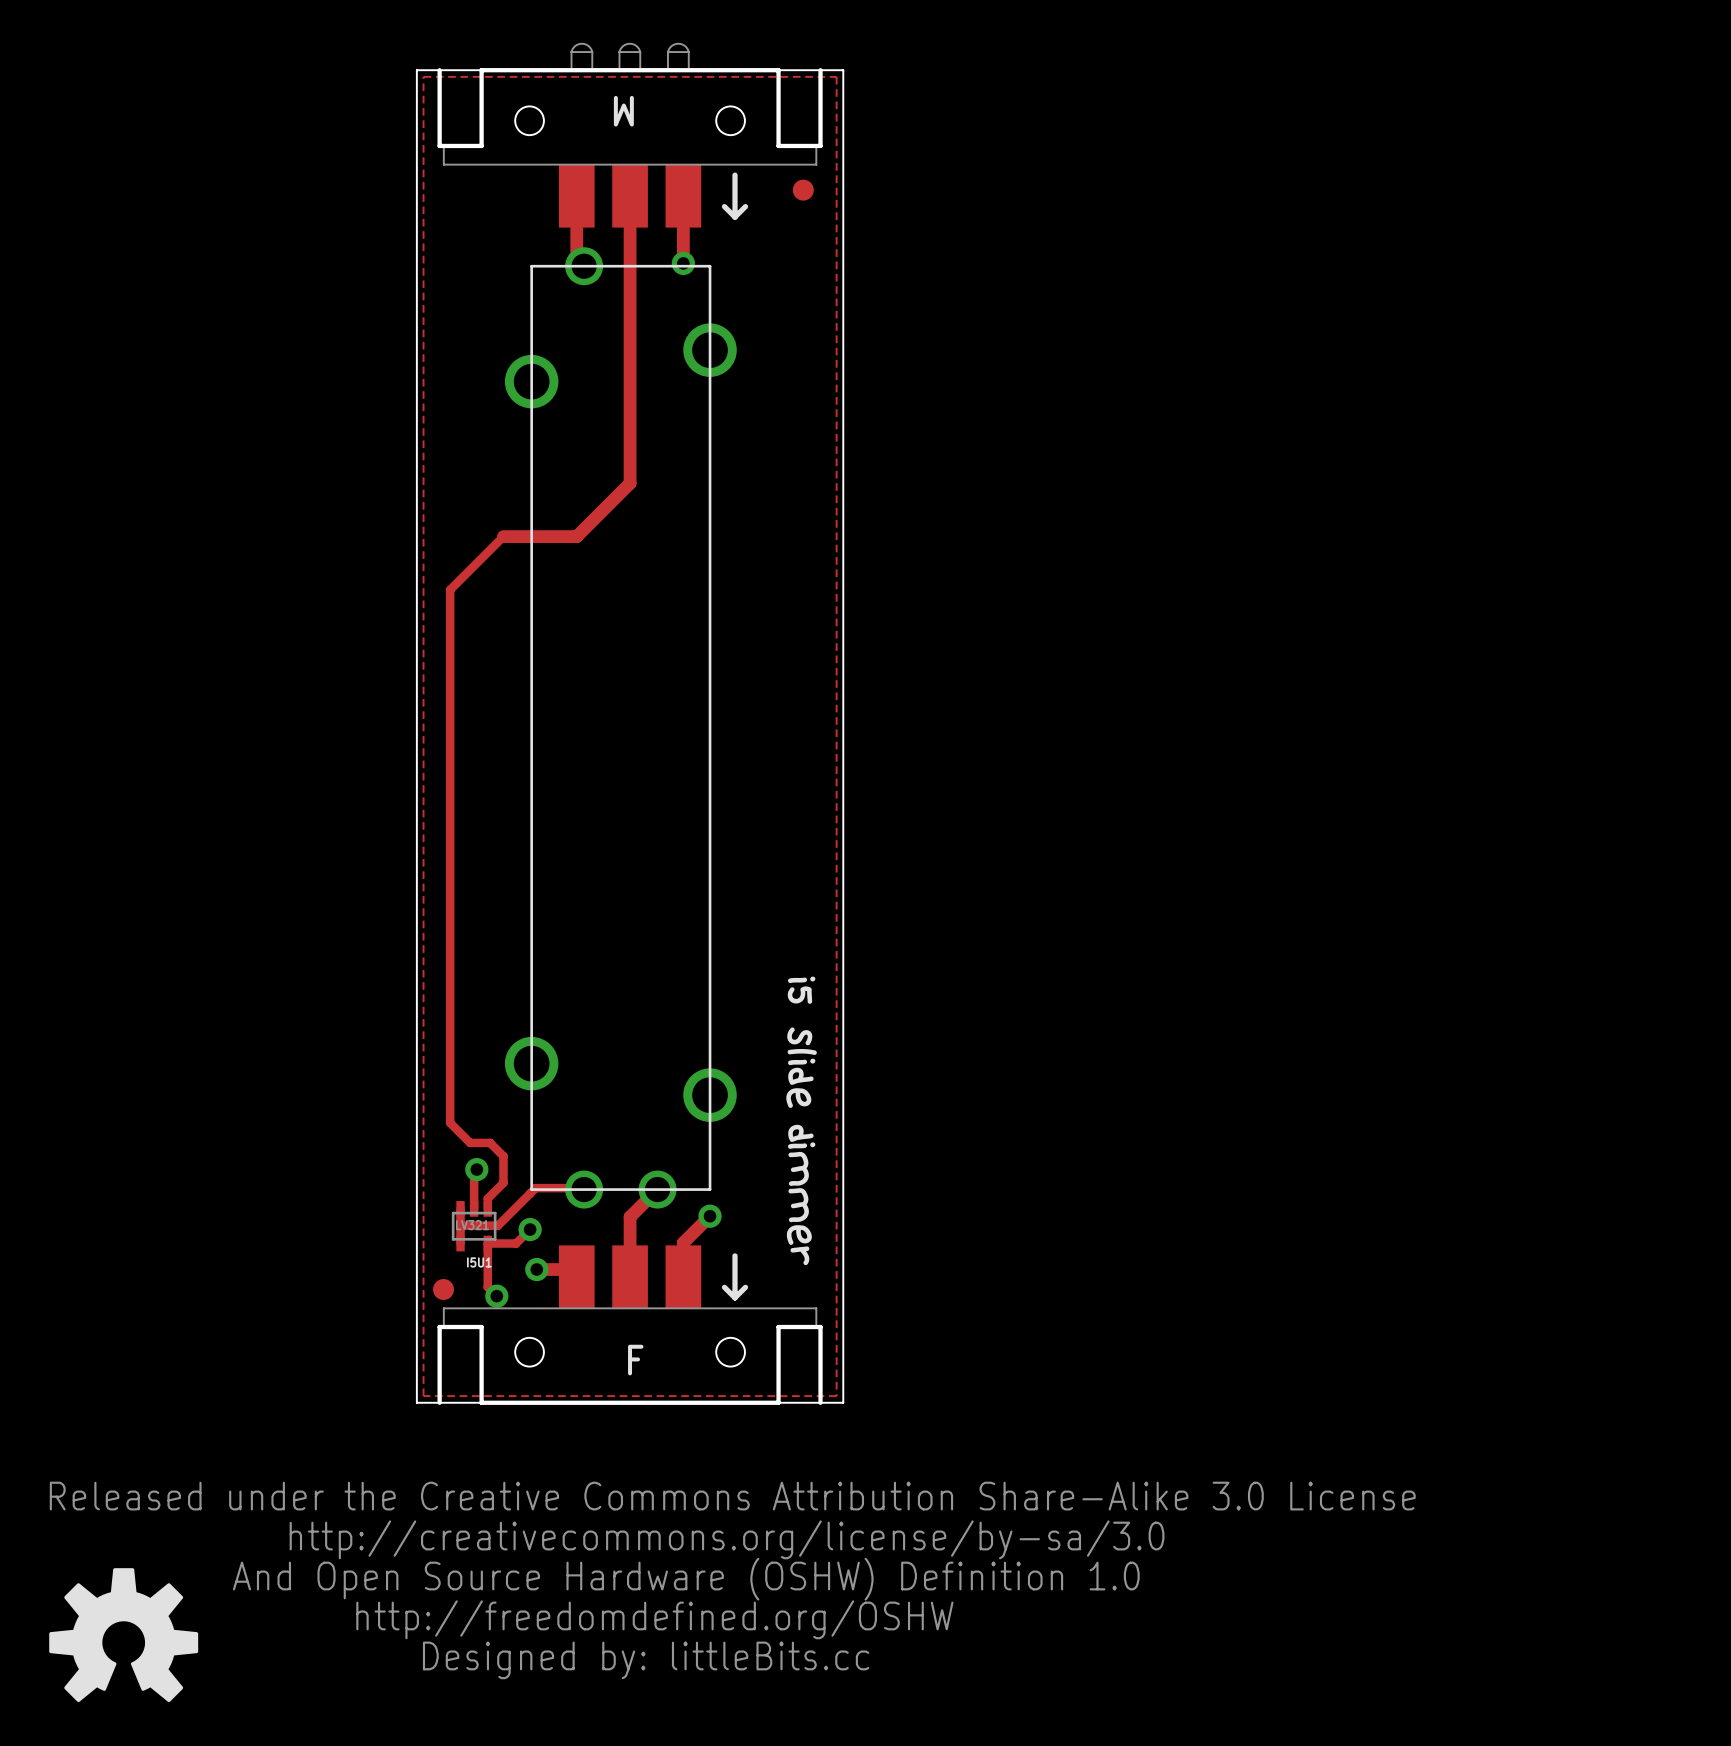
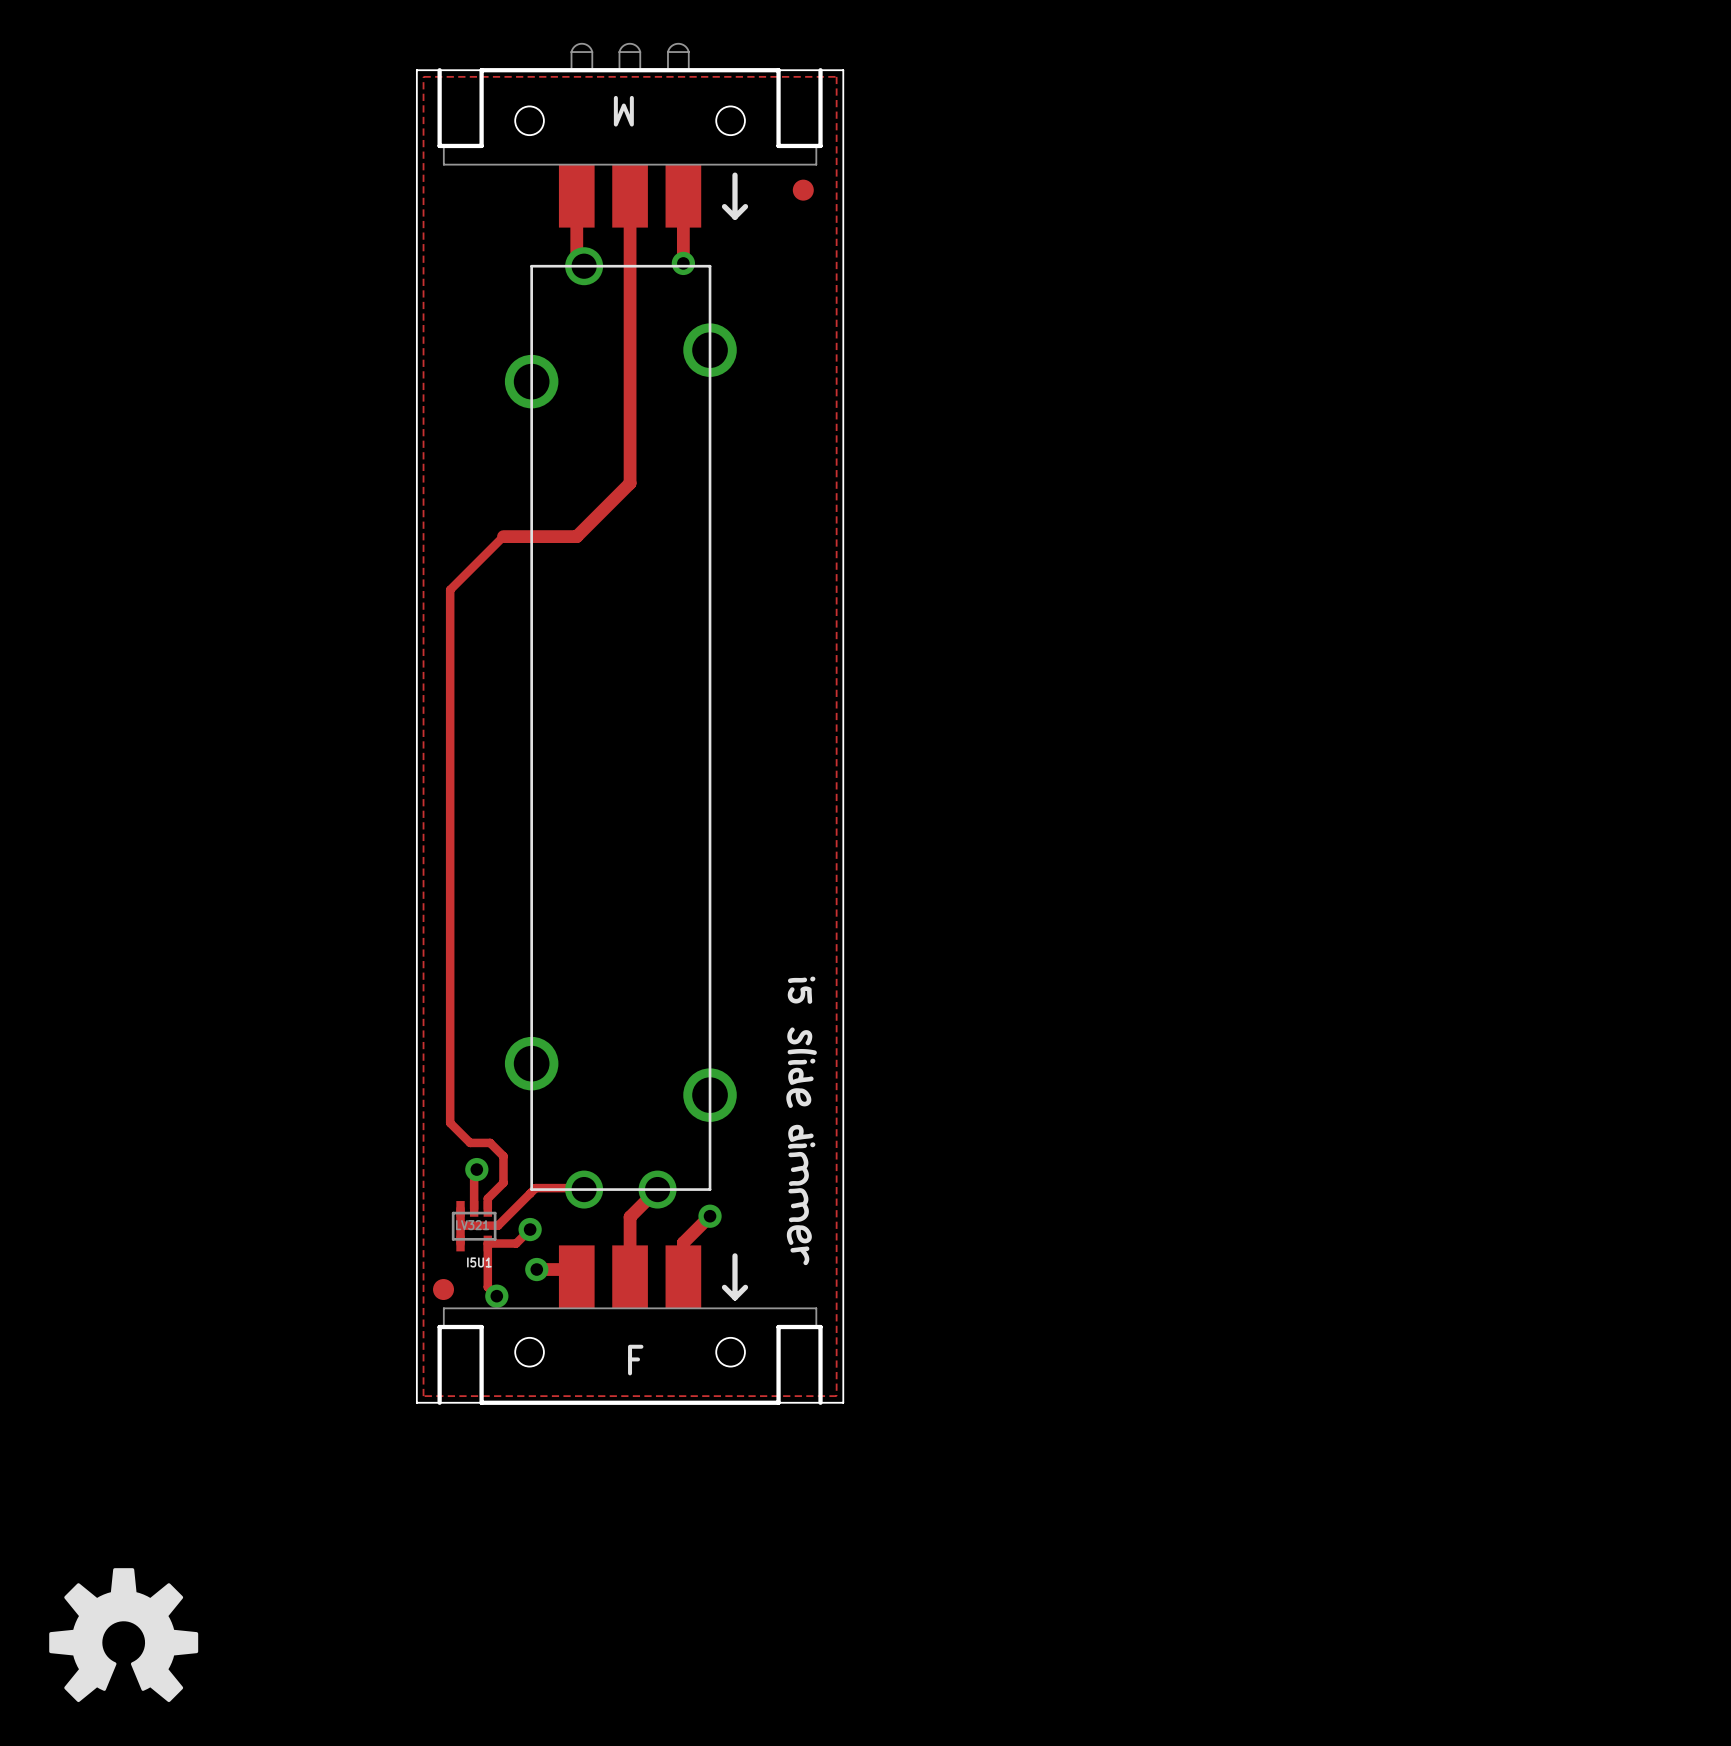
drawing: [49, 1481, 1416, 1680] -> none

